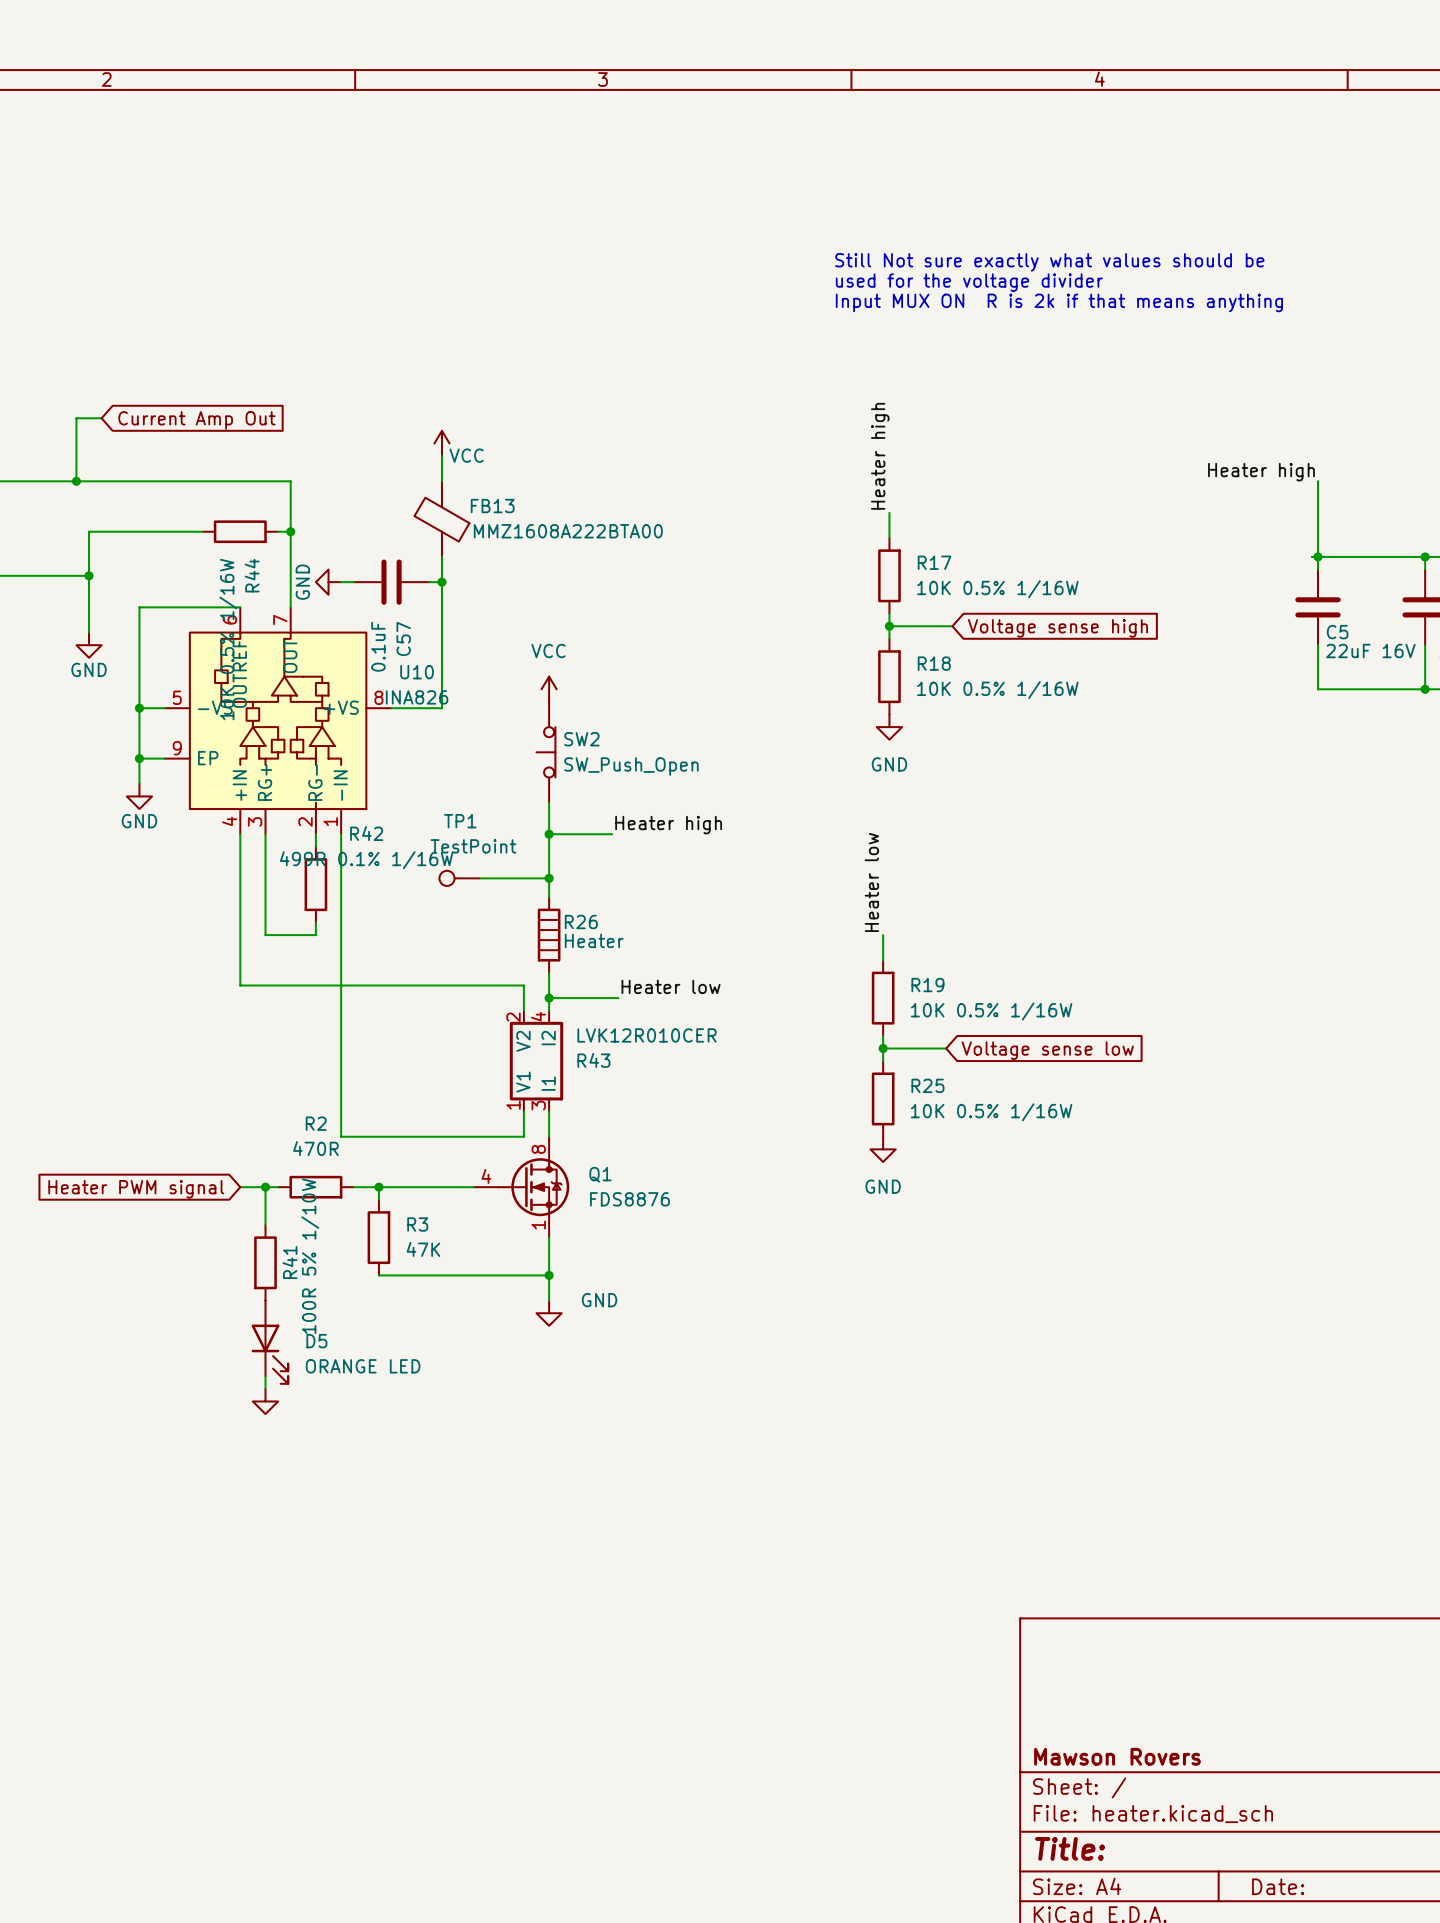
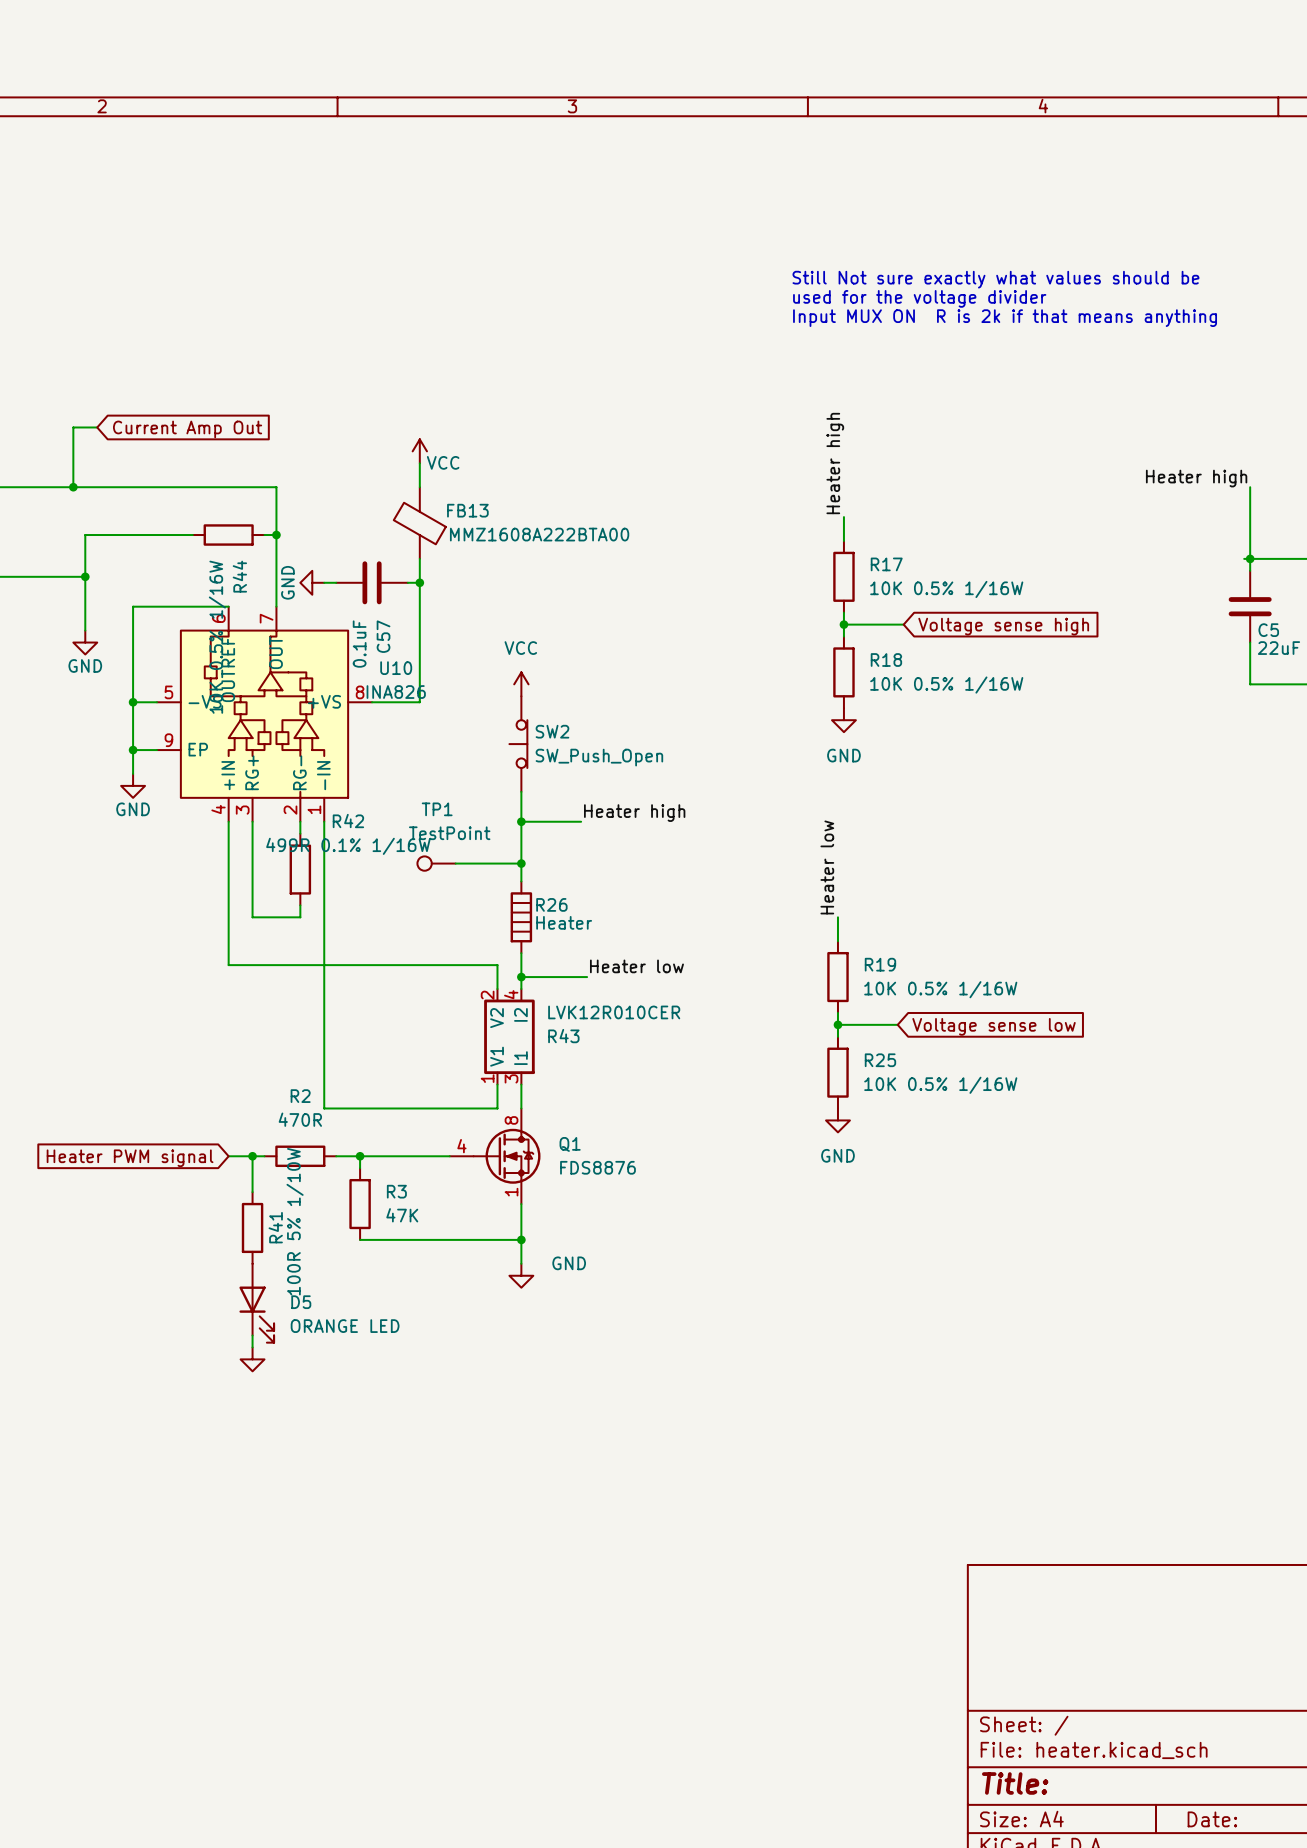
title block: Mawson Rovers (1117, 1756) -> none

